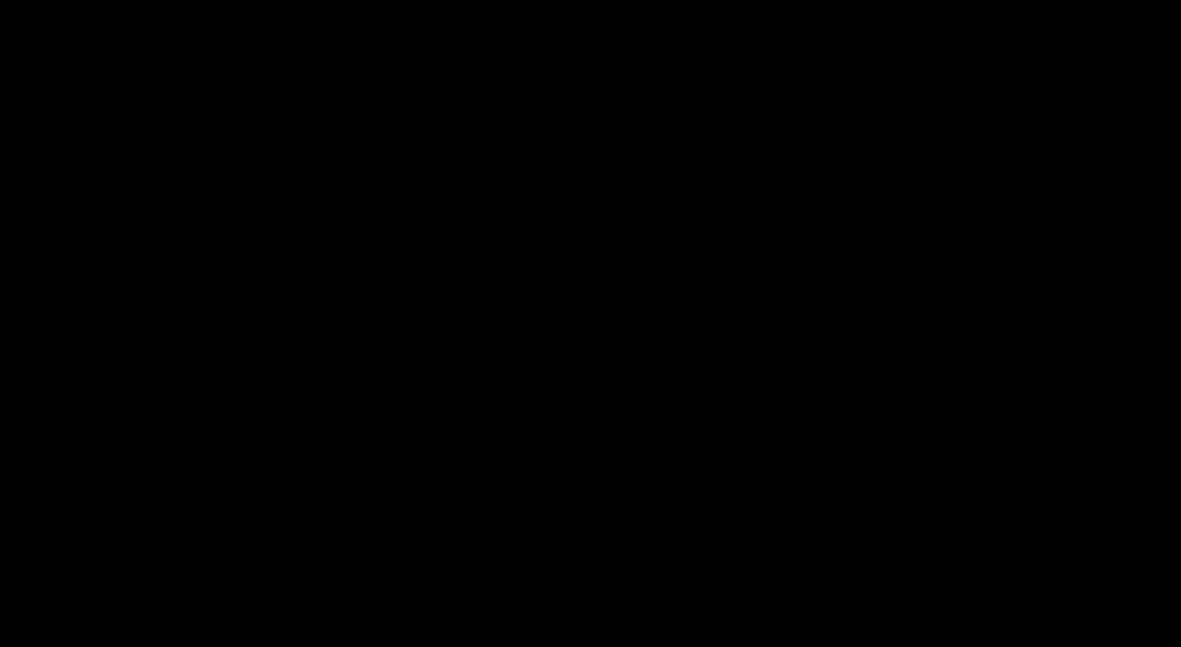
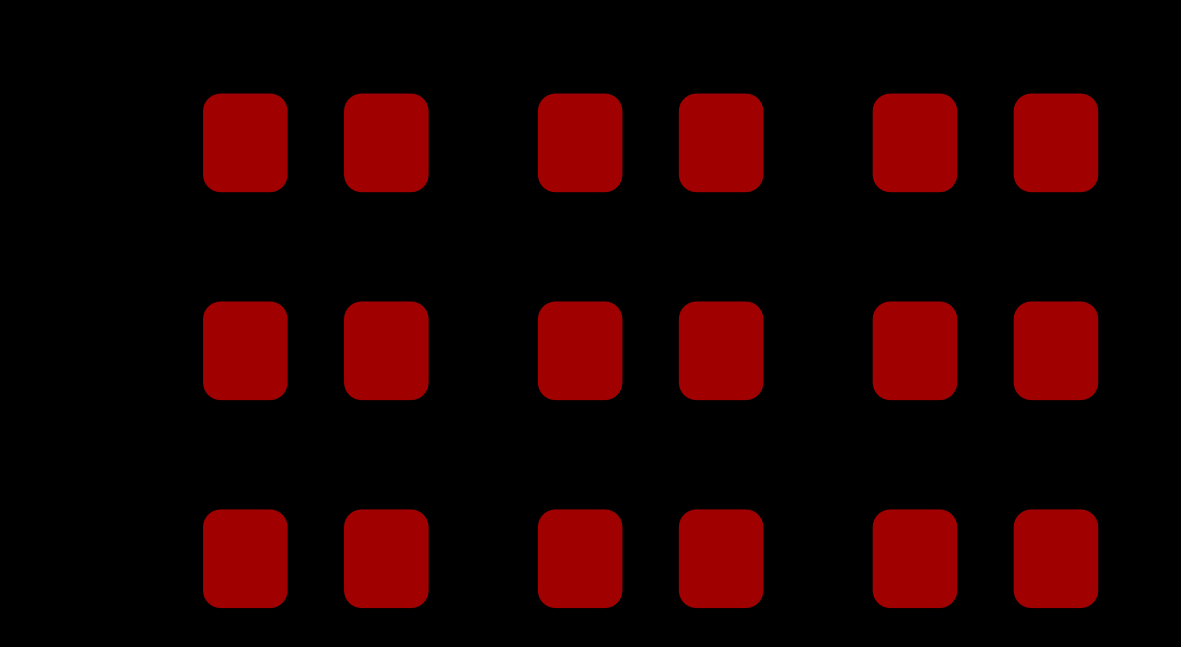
part: none -> (315, 142)
part: none -> (650, 142)
part: none -> (985, 142)
part: none -> (315, 350)
part: none -> (650, 350)
part: none -> (985, 350)
part: none -> (315, 558)
part: none -> (650, 558)
part: none -> (985, 558)

